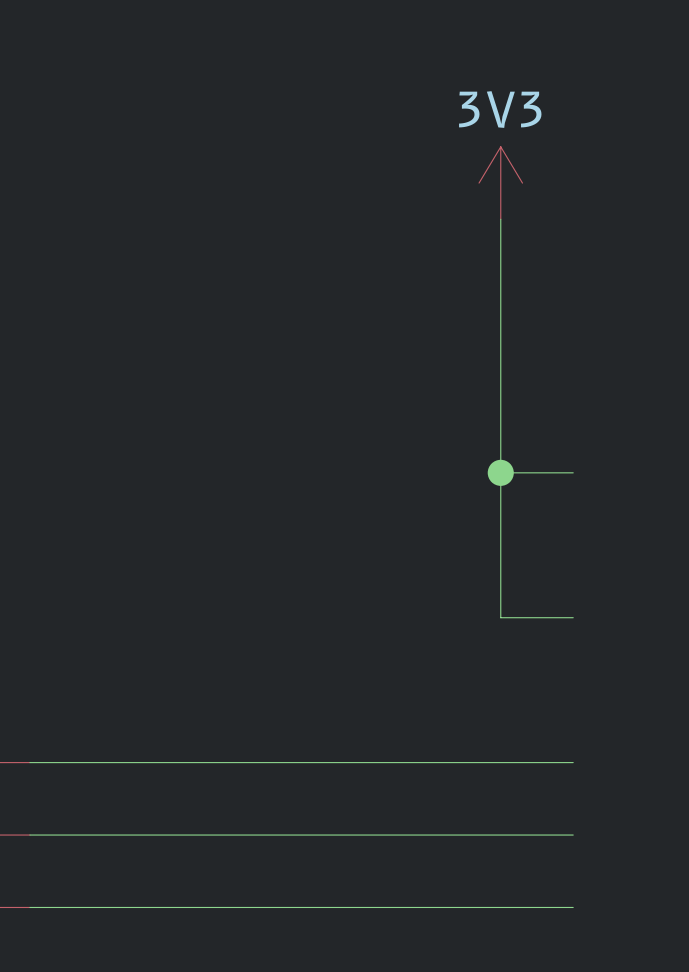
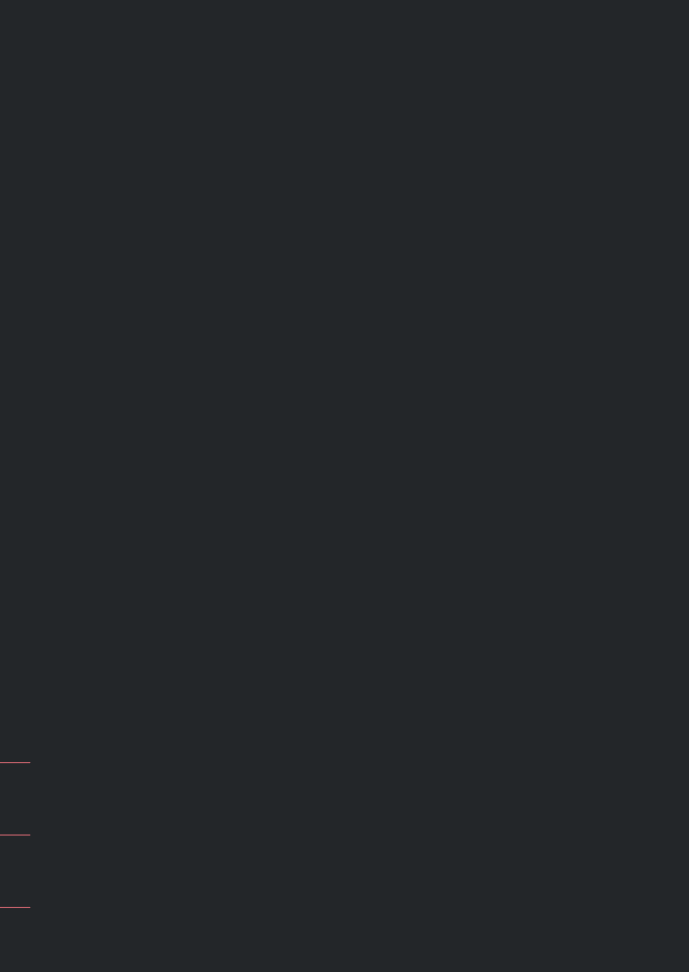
power symbol: 3V3 (500, 183) -> none
wire: (500, 219) (500, 617) (573, 617) -> none
wire: (500, 472) (573, 472) -> none
junction: (500, 472) -> none
wire: (29, 762) (573, 762) -> none
wire: (29, 835) (573, 835) -> none
wire: (29, 907) (573, 907) -> none

